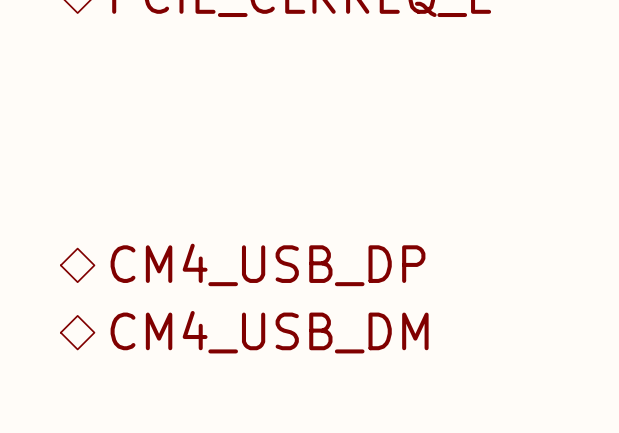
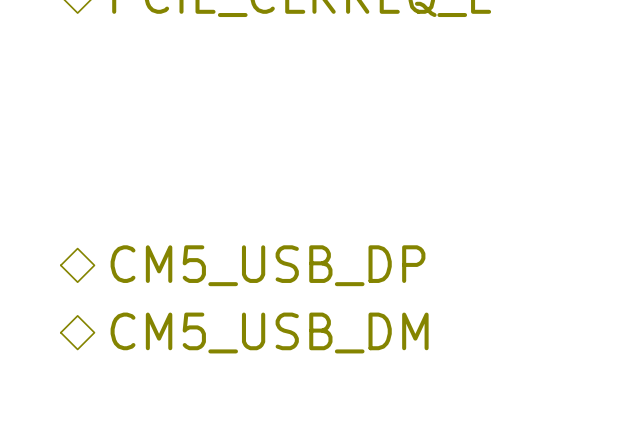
hierarchical label: CM4_USB_DP (268, 264) -> CM5_USB_DP (268, 265)
hierarchical label: CM4_USB_DM (269, 332) -> CM5_USB_DM (269, 333)

